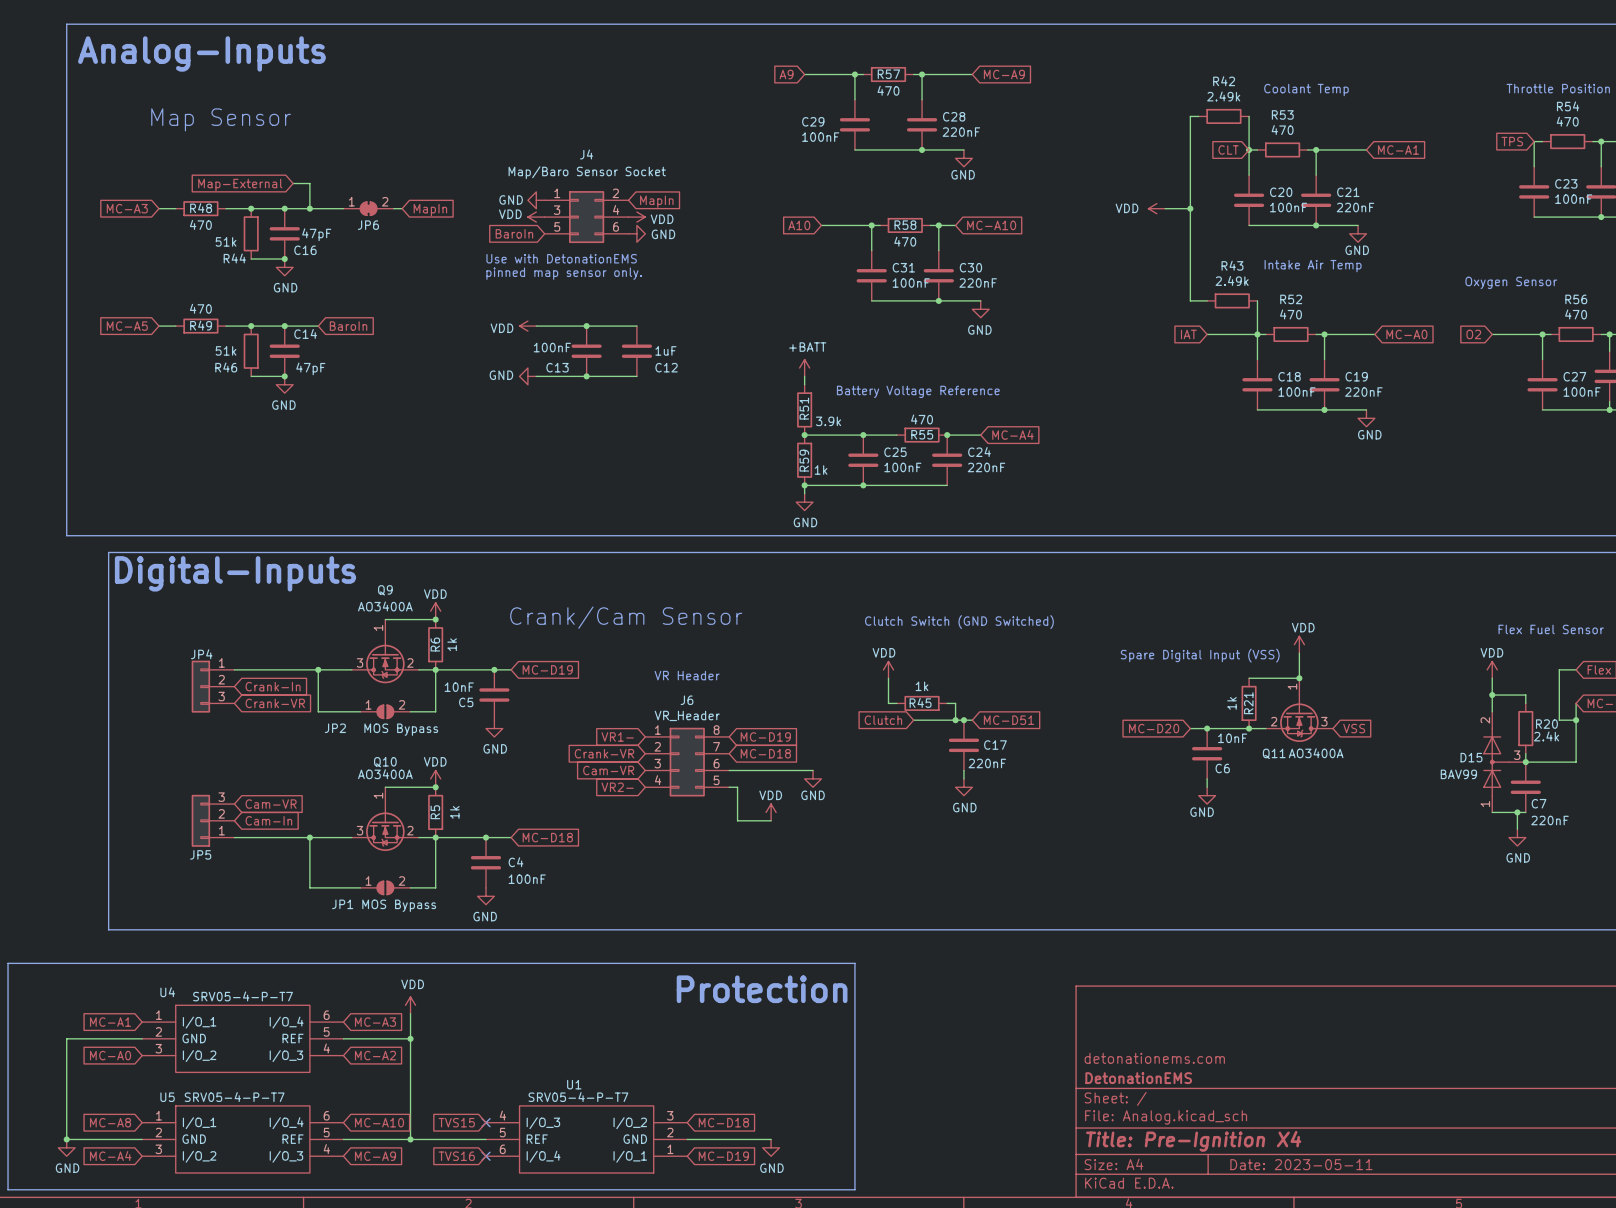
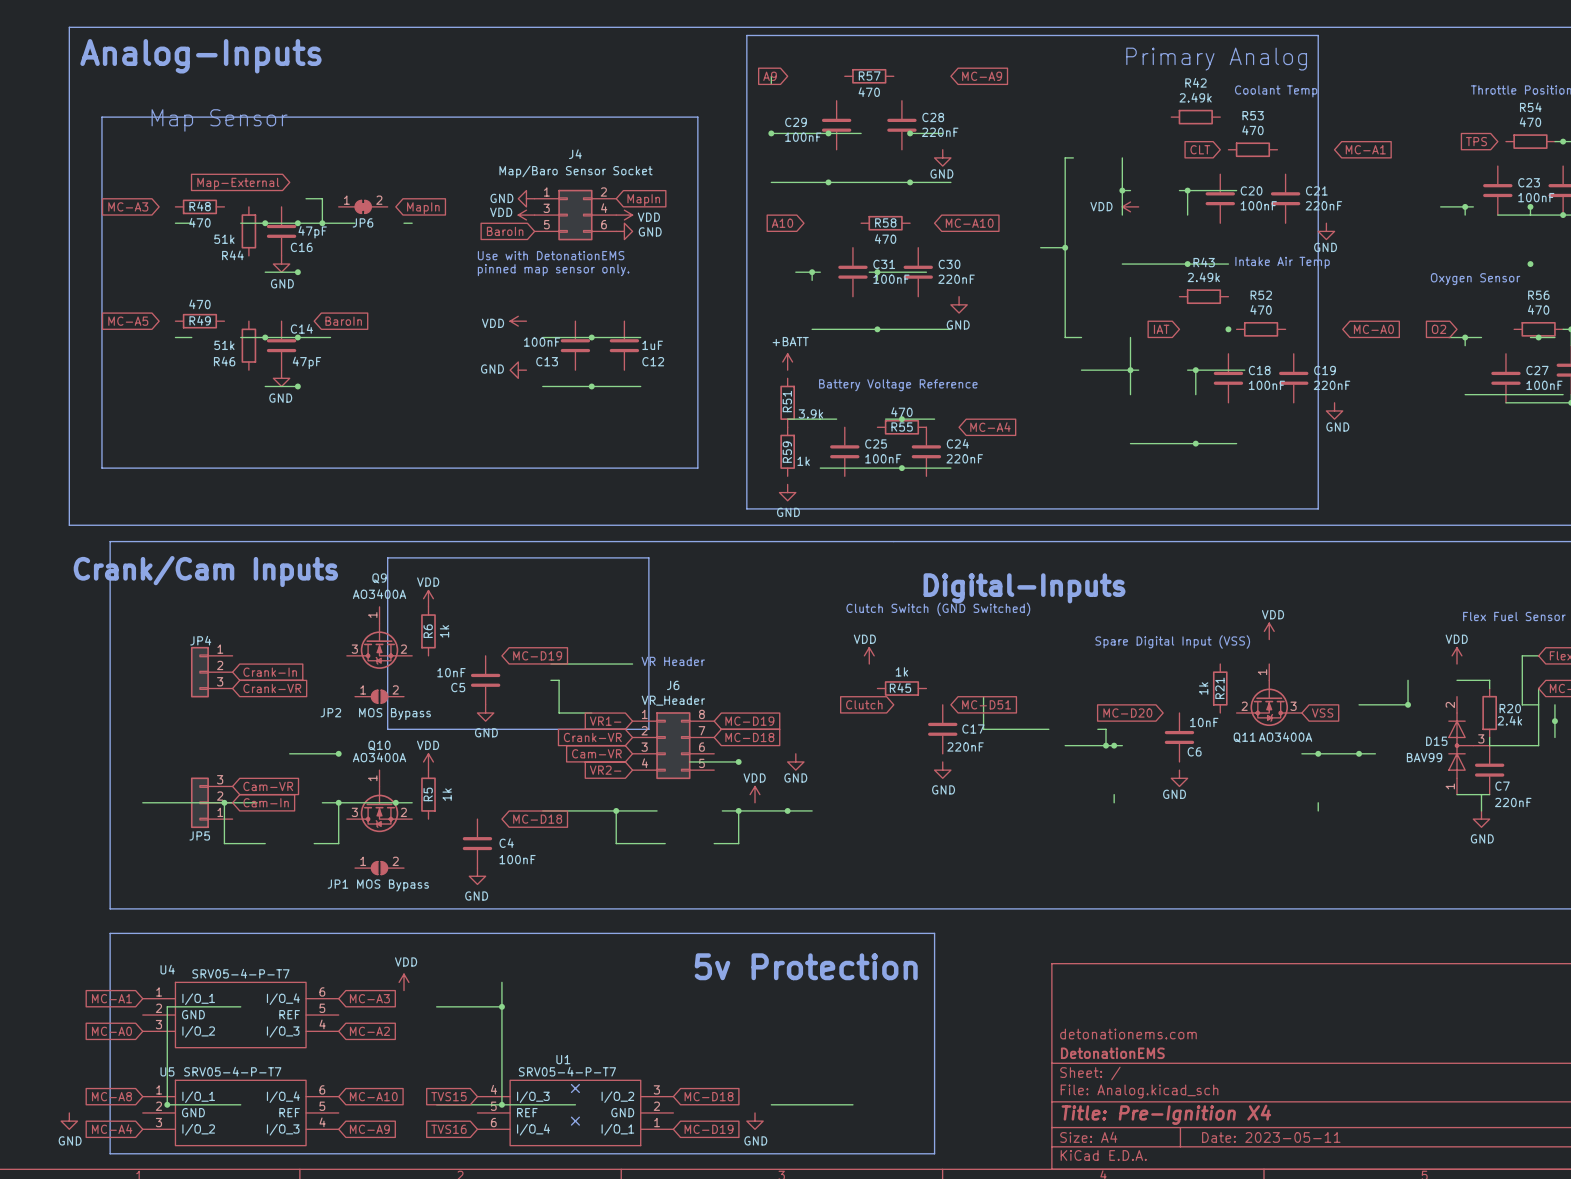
line: none -> (746, 35) (1318, 35) (1318, 508) (746, 508) (746, 35)
text: none -> Primary Analog (1216, 59)
wire: none -> (771, 76) (771, 84)
wire: (804, 74) (863, 74) -> none
wire: (854, 74) (854, 99) -> none
junction: (854, 74) -> none
wire: (913, 74) (972, 74) -> none
wire: (922, 74) (922, 99) -> none
junction: (922, 74) -> none
line: none -> (101, 117) (697, 117) (697, 468) (101, 468) (101, 117)
wire: (1198, 116) (1190, 116) (1190, 300) (1207, 300) -> (1073, 157) (1065, 157) (1065, 337) (1081, 337)
wire: (1249, 116) (1249, 175) -> (1122, 157) (1122, 215)
wire: none -> (771, 133) (861, 133)
junction: none -> (771, 133)
junction: none -> (828, 133)
wire: none -> (910, 133) (942, 133)
junction: none -> (910, 133)
wire: (1542, 141) (1534, 141) (1534, 166) -> none
wire: (1601, 141) (1601, 166) -> none
wire: (854, 149) (963, 149) -> none
junction: (922, 149) -> none
wire: (1249, 149) (1257, 149) -> (1122, 190) (1130, 190)
junction: (1249, 149) -> none
wire: (1307, 149) (1366, 149) -> (1179, 190) (1236, 190)
wire: (1316, 149) (1316, 175) -> (1187, 190) (1187, 215)
junction: (1316, 149) -> none
wire: (293, 183) (309, 183) (309, 208) -> (306, 198) (322, 198) (322, 223)
wire: none -> (771, 182) (950, 182)
junction: none -> (828, 182)
junction: none -> (910, 182)
junction: none -> (1122, 190)
junction: none -> (1187, 190)
wire: (158, 208) (175, 208) -> (175, 223) (191, 223)
wire: (226, 208) (343, 208) -> (240, 223) (355, 223)
junction: (251, 208) -> none
junction: (284, 208) -> none
junction: (309, 208) -> none
wire: (393, 208) (402, 208) -> (404, 223) (412, 223)
wire: (1165, 208) (1190, 208) -> (1040, 247) (1065, 247)
junction: (1190, 208) -> none
wire: none -> (1440, 206) (1473, 206)
wire: none -> (1465, 206) (1465, 215)
junction: none -> (1465, 206)
wire: none -> (1530, 206) (1530, 215)
junction: none -> (1530, 206)
junction: none -> (265, 223)
junction: none -> (297, 223)
junction: none -> (322, 223)
wire: (821, 225) (880, 225) -> (869, 272) (926, 272)
wire: (871, 225) (871, 250) -> none
junction: (871, 225) -> none
wire: (930, 225) (955, 225) -> (795, 272) (820, 272)
wire: (938, 225) (938, 250) -> none
junction: (938, 225) -> none
wire: (1249, 225) (1358, 225) -> (1122, 264) (1228, 264)
junction: (1316, 225) -> none
junction: none -> (1065, 247)
wire: (251, 258) (284, 258) -> (265, 272) (297, 272)
junction: (284, 258) -> none
junction: none -> (1187, 264)
junction: none -> (1530, 264)
junction: none -> (297, 272)
junction: none -> (812, 272)
wire: none -> (877, 272) (877, 280)
junction: none -> (877, 272)
wire: (871, 300) (980, 300) -> none
junction: (938, 300) -> none
wire: (1257, 300) (1257, 359) -> (1130, 337) (1130, 394)
wire: (158, 326) (175, 326) -> (175, 337) (191, 337)
wire: (226, 326) (318, 326) -> (240, 337) (330, 337)
junction: (251, 326) -> none
junction: (284, 326) -> none
wire: (536, 326) (636, 326) -> (542, 337) (640, 337)
junction: (586, 326) -> none
wire: none -> (812, 329) (950, 329)
junction: none -> (877, 329)
wire: (1207, 334) (1265, 334) -> (1081, 370) (1138, 370)
wire: (1316, 334) (1374, 334) -> (1187, 370) (1244, 370)
wire: (1324, 334) (1324, 359) -> (1195, 370) (1195, 394)
junction: (1324, 334) -> none
wire: (1492, 334) (1550, 334) -> none
wire: (1542, 334) (1542, 359) -> none
junction: (1542, 334) -> none
junction: none -> (265, 337)
junction: none -> (297, 337)
junction: none -> (591, 337)
wire: none -> (1448, 337) (1481, 337)
wire: none -> (1465, 337) (1465, 345)
junction: none -> (1465, 337)
wire: none -> (1530, 337) (1554, 337)
junction: none -> (1538, 337)
wire: (251, 376) (284, 376) -> (265, 386) (297, 386)
junction: (284, 376) -> none
wire: (536, 376) (636, 376) -> (542, 386) (640, 386)
junction: (586, 376) -> none
wire: (804, 376) (804, 384) -> (812, 272) (812, 280)
junction: none -> (1130, 370)
junction: none -> (1195, 370)
junction: none -> (297, 386)
junction: none -> (591, 386)
wire: none -> (1465, 394) (1563, 394)
wire: (1257, 409) (1366, 409) -> (1130, 443) (1236, 443)
junction: (1324, 409) -> none
wire: none -> (787, 419) (836, 419)
wire: none -> (885, 419) (934, 419)
junction: none -> (901, 419)
wire: (804, 435) (896, 435) -> none
junction: (804, 435) -> none
junction: (863, 435) -> none
wire: (947, 435) (980, 435) -> none
junction: (947, 435) -> none
junction: none -> (1195, 443)
wire: none -> (820, 468) (950, 468)
junction: none -> (901, 468)
junction: (804, 485) -> none
junction: (863, 485) -> none
wire: (947, 485) (804, 485) (804, 493) -> none
line: none -> (387, 557) (648, 557) (648, 729) (387, 729) (387, 557)
text: Digital-Inputs (235, 573) -> none
text: none -> Crank/Cam Inputs (205, 571)
text: none -> Digital-Inputs (1024, 588)
text: Crank/Cam Sensor (626, 617) -> none
wire: (385, 619) (435, 619) -> none
junction: (435, 619) -> none
wire: (1299, 653) (1299, 678) (1249, 678) -> (1408, 680) (1408, 704) (1359, 704)
wire: (234, 669) (351, 669) -> none
wire: (318, 669) (318, 711) (360, 711) -> none
junction: (318, 669) -> none
wire: (418, 669) (511, 669) -> none
wire: (435, 669) (435, 711) (410, 711) -> none
junction: (435, 669) -> none
junction: (494, 669) -> none
wire: none -> (550, 664) (632, 664)
wire: (888, 678) (888, 703) (896, 703) -> none
junction: (1299, 678) -> none
wire: (1492, 678) (1492, 711) -> (1554, 704) (1554, 737)
wire: none -> (550, 680) (559, 680) (559, 712) (591, 712)
junction: (1492, 695) -> none
wire: (947, 703) (955, 703) (955, 720) -> none
wire: none -> (983, 696) (983, 729) (1048, 729)
wire: (913, 720) (972, 720) -> none
junction: (955, 720) -> none
junction: (963, 720) -> none
junction: none -> (1408, 704)
junction position: (1576, 720) -> (1554, 721)
wire: (1190, 728) (1265, 728) -> (1301, 753) (1375, 753)
junction: (1207, 728) -> none
junction: (1249, 728) -> none
wire: none -> (1097, 729) (1106, 729) (1106, 745)
wire: none -> (1065, 745) (1122, 745)
junction: none -> (1106, 745)
junction: none -> (1114, 745)
junction: (1525, 762) -> none
junction: none -> (338, 753)
wire: (729, 770) (813, 770) -> none
wire: (963, 770) (963, 778) -> none
junction: none -> (1318, 753)
junction: none -> (1359, 753)
wire: none -> (689, 761) (738, 761)
junction: none -> (738, 761)
wire: (1207, 778) (1207, 787) -> (1318, 802) (1318, 810)
wire: (385, 787) (435, 787) -> (289, 753) (338, 753)
junction: (435, 787) -> none
wire: (729, 787) (737, 787) (737, 820) (771, 820) -> none
wire: none -> (1114, 794) (1114, 802)
junction: (1517, 812) -> none
wire: none -> (224, 802) (224, 843) (265, 843)
junction: none -> (224, 802)
wire: none -> (338, 802) (338, 843) (314, 843)
junction: none -> (338, 802)
junction: none -> (395, 802)
wire: none -> (542, 810) (657, 810)
wire: none -> (616, 810) (616, 843) (665, 843)
junction: none -> (616, 810)
wire: none -> (722, 810) (812, 810)
wire: none -> (738, 810) (738, 843) (714, 843)
junction: none -> (738, 810)
junction: none -> (787, 810)
wire: (234, 837) (351, 837) -> (142, 802) (257, 802)
wire: (309, 837) (309, 887) (360, 887) -> none
junction: (309, 837) -> none
wire: (418, 837) (511, 837) -> (322, 802) (412, 802)
wire: (435, 837) (435, 887) (410, 887) -> none
junction: (435, 837) -> none
junction: (485, 837) -> none
line: (8, 963) (854, 963) (854, 1189) (8, 1189) (8, 963) -> (110, 933) (934, 933) (934, 1153) (110, 1153) (110, 933)
text: Protection (762, 989) -> 5v Protection (806, 966)
wire: (410, 1013) (410, 1139) -> (501, 982) (501, 1104)
junction: none -> (501, 1006)
wire: (142, 1038) (66, 1038) (66, 1139) (142, 1139) -> (240, 1006) (167, 1006) (167, 1104) (240, 1104)
wire: (343, 1038) (410, 1038) -> (436, 1006) (501, 1006)
junction: (410, 1038) -> none
no-connect mark: none -> (575, 1088)
no-connect mark: (485, 1122) -> none
junction: none -> (167, 1104)
junction: none -> (501, 1104)
junction: (66, 1139) -> none
wire: (343, 1139) (485, 1139) -> (436, 1104) (575, 1104)
junction: (410, 1139) -> none
wire: (687, 1139) (771, 1139) -> (771, 1104) (852, 1104)
no-connect mark: none -> (575, 1121)
no-connect mark: (485, 1156) -> none

